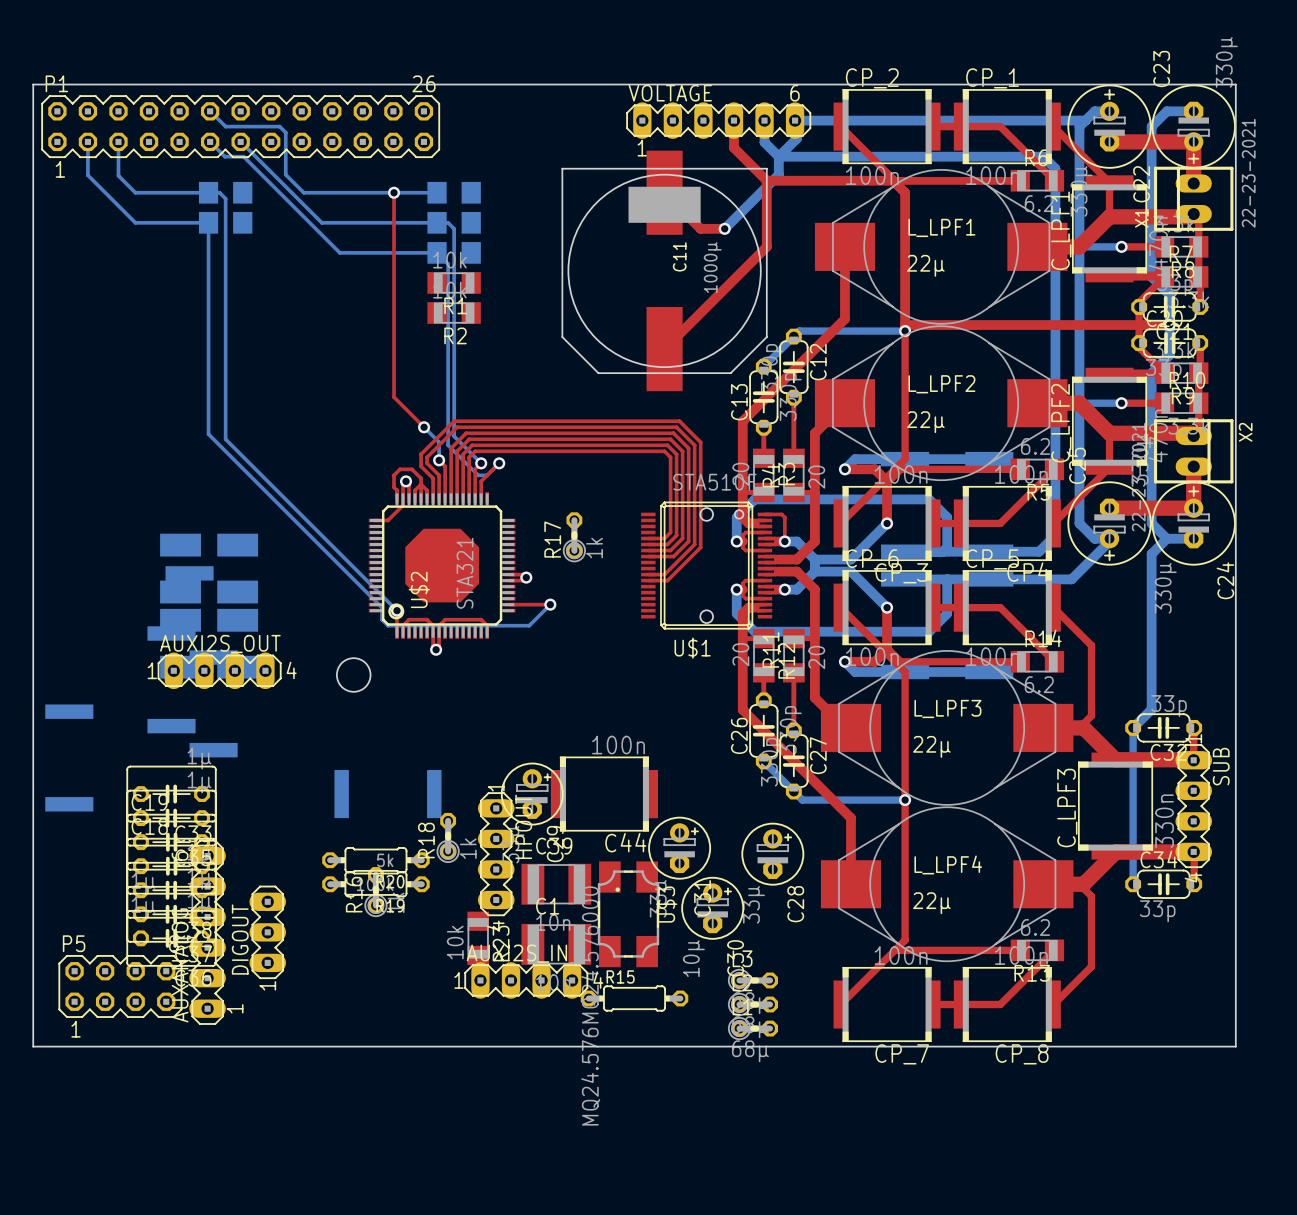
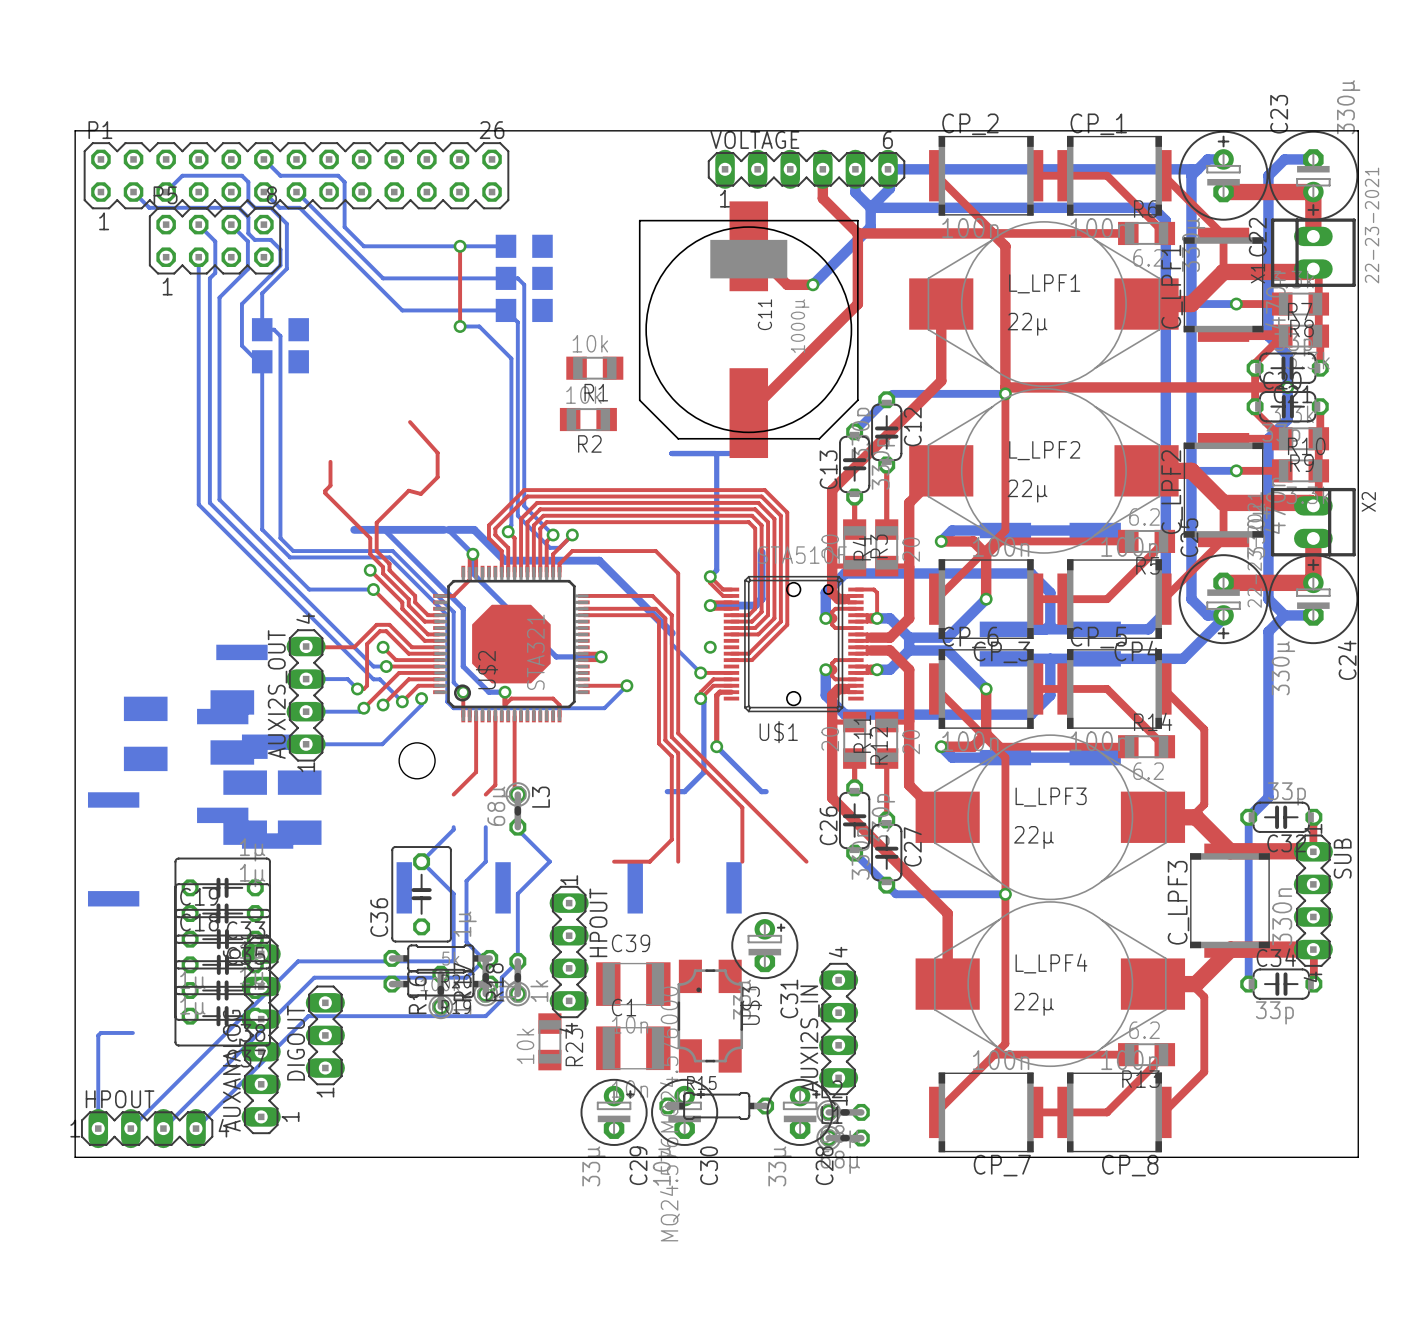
bottom track: (87, 141) (87, 175) (135, 222) (208, 222) (208, 236) -> (166, 192) (182, 175) (241, 175) (248, 182) (248, 201) (254, 207) (270, 207) (286, 223) (286, 268) (262, 293)
bottom track: (118, 141) (118, 175) (135, 192) (219, 192) (225, 198) -> (133, 192) (149, 207) (238, 207) (248, 217) (248, 233) (254, 239) (270, 239) (280, 249) (280, 252)
bottom track: none -> (198, 224) (215, 241) (215, 272) (209, 278) (209, 502) (373, 666) (386, 666)
bottom track: none -> (231, 224) (247, 241) (247, 269) (219, 297) (219, 499) (309, 589) (373, 589)
part: (225, 192) -> none
bottom track: none -> (198, 257) (198, 504) (373, 679) (379, 679) (402, 701)
bottom track: (225, 210) (225, 276) -> (280, 265) (241, 304) (241, 345) (258, 361) (262, 361)
part: (225, 222) -> none
top track: (394, 267) (394, 397) (424, 427) -> none
via: none -> (460, 326)
bottom track: (208, 270) (208, 300) -> (262, 329) (274, 329) (280, 336)
part: none -> (280, 329)
R1 position: (454, 282) -> (594, 368)
part: none -> (280, 361)
R2 position: (454, 313) -> (588, 419)
top track: none -> (410, 422) (437, 452) (437, 477) (420, 493) (408, 490) (376, 522) (376, 551) (389, 563) (389, 570) (415, 595) (415, 602) (428, 615) (438, 615)
bottom track: none -> (671, 453) (761, 453)
bottom track: none -> (715, 453) (716, 570) (710, 576)
top track: none -> (330, 461) (330, 485) (325, 493) (370, 538) (370, 554) (383, 567) (383, 573) (408, 599) (408, 605) (424, 621) (438, 621)
bottom track: (424, 427) (439, 442) (439, 457) -> (460, 326) (479, 326) (511, 358) (511, 525) (508, 528)
via: (424, 427) -> none
bottom track: (208, 434) (381, 607) -> (262, 503) (262, 529) (290, 557) (389, 557) (447, 615) (447, 688)
bottom track: (225, 439) (387, 601) -> (280, 509) (280, 538) (293, 551) (392, 551) (453, 611) (453, 682)
bottom track: none -> (448, 529) (474, 529) (504, 560) (599, 560) (671, 633) (671, 644) (700, 672)
bottom track: none -> (448, 529) (444, 529) (354, 529) (384, 529) (463, 608) (463, 666) (488, 692) (504, 692)
bottom track: none -> (448, 529) (472, 554) (472, 573) (556, 656) (601, 656)
bottom track: none -> (761, 552) (761, 599) (755, 605) (710, 605)
top track: none -> (370, 570) (402, 602) (402, 608) (428, 634) (438, 634)
via: none -> (370, 570)
top track: (397, 497) (397, 490) (394, 487) (394, 475) (400, 469) (412, 469) (421, 478) (421, 497) -> none
top track: (415, 497) (415, 490) (421, 484) (427, 490) (427, 497) -> none
top track: none -> (559, 571) (559, 563) (572, 551) (655, 551) (678, 573) (678, 733) (806, 861)
via: none -> (710, 576)
top track: none -> (373, 589) (424, 640) (438, 640)
via: none -> (373, 589)
top track: none -> (731, 589) (723, 589) (710, 576) (710, 583) (723, 595) (731, 595)
top track: none -> (583, 595) (652, 595) (671, 615) (671, 737) (742, 807) (742, 861)
top track: none -> (731, 602) (713, 602) (710, 605) (713, 608) (731, 608)
via: none -> (710, 605)
top track: none -> (583, 608) (655, 608) (665, 618) (665, 740) (678, 753) (678, 861)
R17 position: (574, 537) -> (485, 979)
top track: none -> (583, 615) (652, 615) (658, 621) (658, 743) (671, 756) (671, 839) (649, 861) (614, 861)
top track: none -> (306, 646) (354, 647) (376, 624) (389, 624) (411, 647) (438, 647)
part: (180, 568) -> none
part: (237, 568) -> none
top track: none -> (383, 647) (395, 660) (438, 660)
via: none -> (383, 647)
via: none -> (710, 647)
top track: none -> (438, 653) (408, 653) (386, 631) (379, 631) (367, 644) (367, 685) (363, 688) (357, 688)
top track: none -> (386, 666) (438, 666)
via: none -> (386, 666)
top track: none -> (438, 672) (399, 672) (363, 708)
top track: none -> (700, 672) (731, 672)
via: none -> (700, 672)
bottom track: none -> (306, 679) (347, 679) (357, 688)
top track: none -> (438, 679) (408, 679) (383, 705)
top track: none -> (731, 679) (713, 679) (700, 692) (700, 698) (713, 685) (731, 685)
top track: none -> (438, 685) (418, 685) (402, 701)
via: none -> (357, 688)
top track: none -> (731, 692) (719, 692) (716, 695) (716, 746)
bottom track: none -> (421, 698) (421, 705) (382, 744) (306, 744)
via: none -> (421, 698)
bottom track: none -> (700, 698) (703, 701) (703, 772) (684, 791) (667, 791)
via: none -> (700, 698)
via: none -> (402, 701)
via: none -> (383, 705)
bottom track: none -> (363, 708) (360, 711) (306, 711)
via: none -> (363, 708)
top track: (403, 625) (409, 619) (427, 619) (433, 625) (433, 646) (436, 649) (439, 646) (439, 625) (445, 619) (481, 619) (487, 625) -> (504, 692) (504, 705) (511, 698) (553, 698) (559, 705) (559, 708)
top track: none -> (476, 716) (476, 772) (453, 794)
top track: none -> (495, 716) (495, 784) (485, 794)
top track: none -> (514, 716) (514, 791) (517, 794)
part: (237, 643) -> none
part: none -> (145, 733)
via position: (436, 649) -> (504, 692)
bottom track: none -> (716, 746) (761, 791) (766, 791)
via: none -> (716, 746)
AUXI2S_OUT rotation: 0° (219, 670) -> 90° counterclockwise (306, 695)
part: none -> (245, 807)
part: none -> (299, 807)
bottom track: none -> (453, 827) (453, 829) (421, 861) (453, 893) (453, 961) (298, 961) (130, 1128)
bottom track: none -> (485, 827) (485, 861) (466, 880) (466, 942) (485, 961) (482, 961) (466, 977) (314, 977) (163, 1128)
bottom track: none -> (517, 827) (517, 829) (549, 861) (517, 893) (517, 961) (501, 977) (501, 1000) (485, 1016) (308, 1016) (196, 1128)
C29 position: (532, 794) -> (614, 1112)
C44: 100n (604, 794) -> none
R18 position: (448, 837) -> (517, 979)
C28 position: (772, 854) -> (800, 1112)
C30 position: (712, 908) -> (684, 1112)
bottom track: none -> (132, 1032) (100, 1032) (98, 1035) (98, 1128)
C36 rotation: 0° (171, 938) -> 90° clockwise (421, 894)
C36 position: (171, 938) -> (421, 894)
AUXI2S_IN rotation: 0° (526, 980) -> 90° counterclockwise (838, 1029)
AUXI2S_IN position: (526, 980) -> (838, 1029)
L3 rotation: 0° (752, 980) -> 90° clockwise (517, 808)
L3 position: (752, 980) -> (517, 808)
P5 position: (120, 986) -> (215, 240)
HPOUT: none -> (147, 1128)

